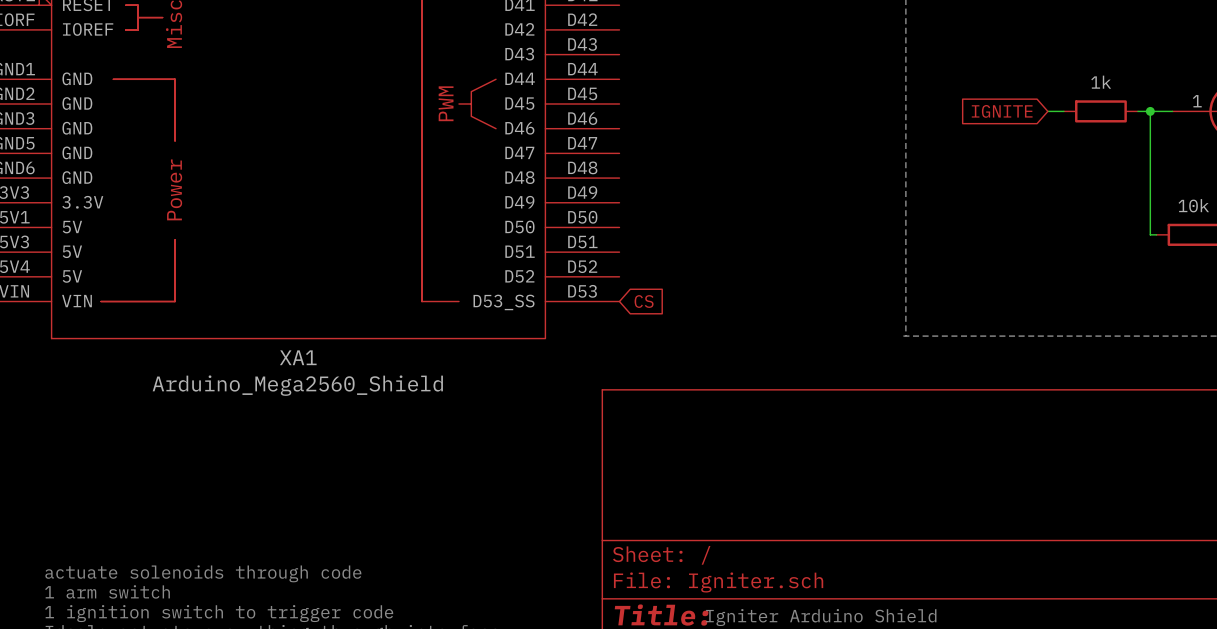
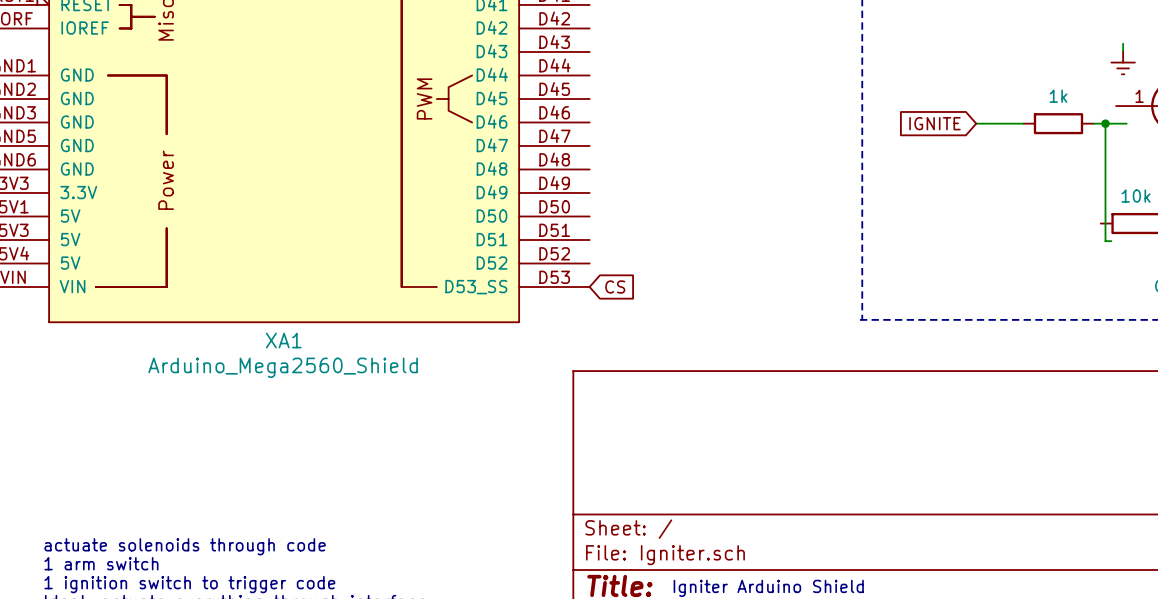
wire: none -> (1123, 43) (1123, 50)
power symbol: none -> (1123, 62)
global label position: IGNITE (1002, 111) -> IGNITE (934, 123)
wire: (1047, 111) (1063, 111) -> none
part position: (1100, 111) -> (1058, 123)
wire: (1137, 111) (1172, 111) -> (1093, 123) (1126, 123)
wire: (1150, 111) (1150, 234) (1156, 234) -> (1105, 123) (1105, 241) (1111, 241)
junction position: (1150, 111) -> (1105, 123)
wire: none -> (976, 123) (1023, 123)

